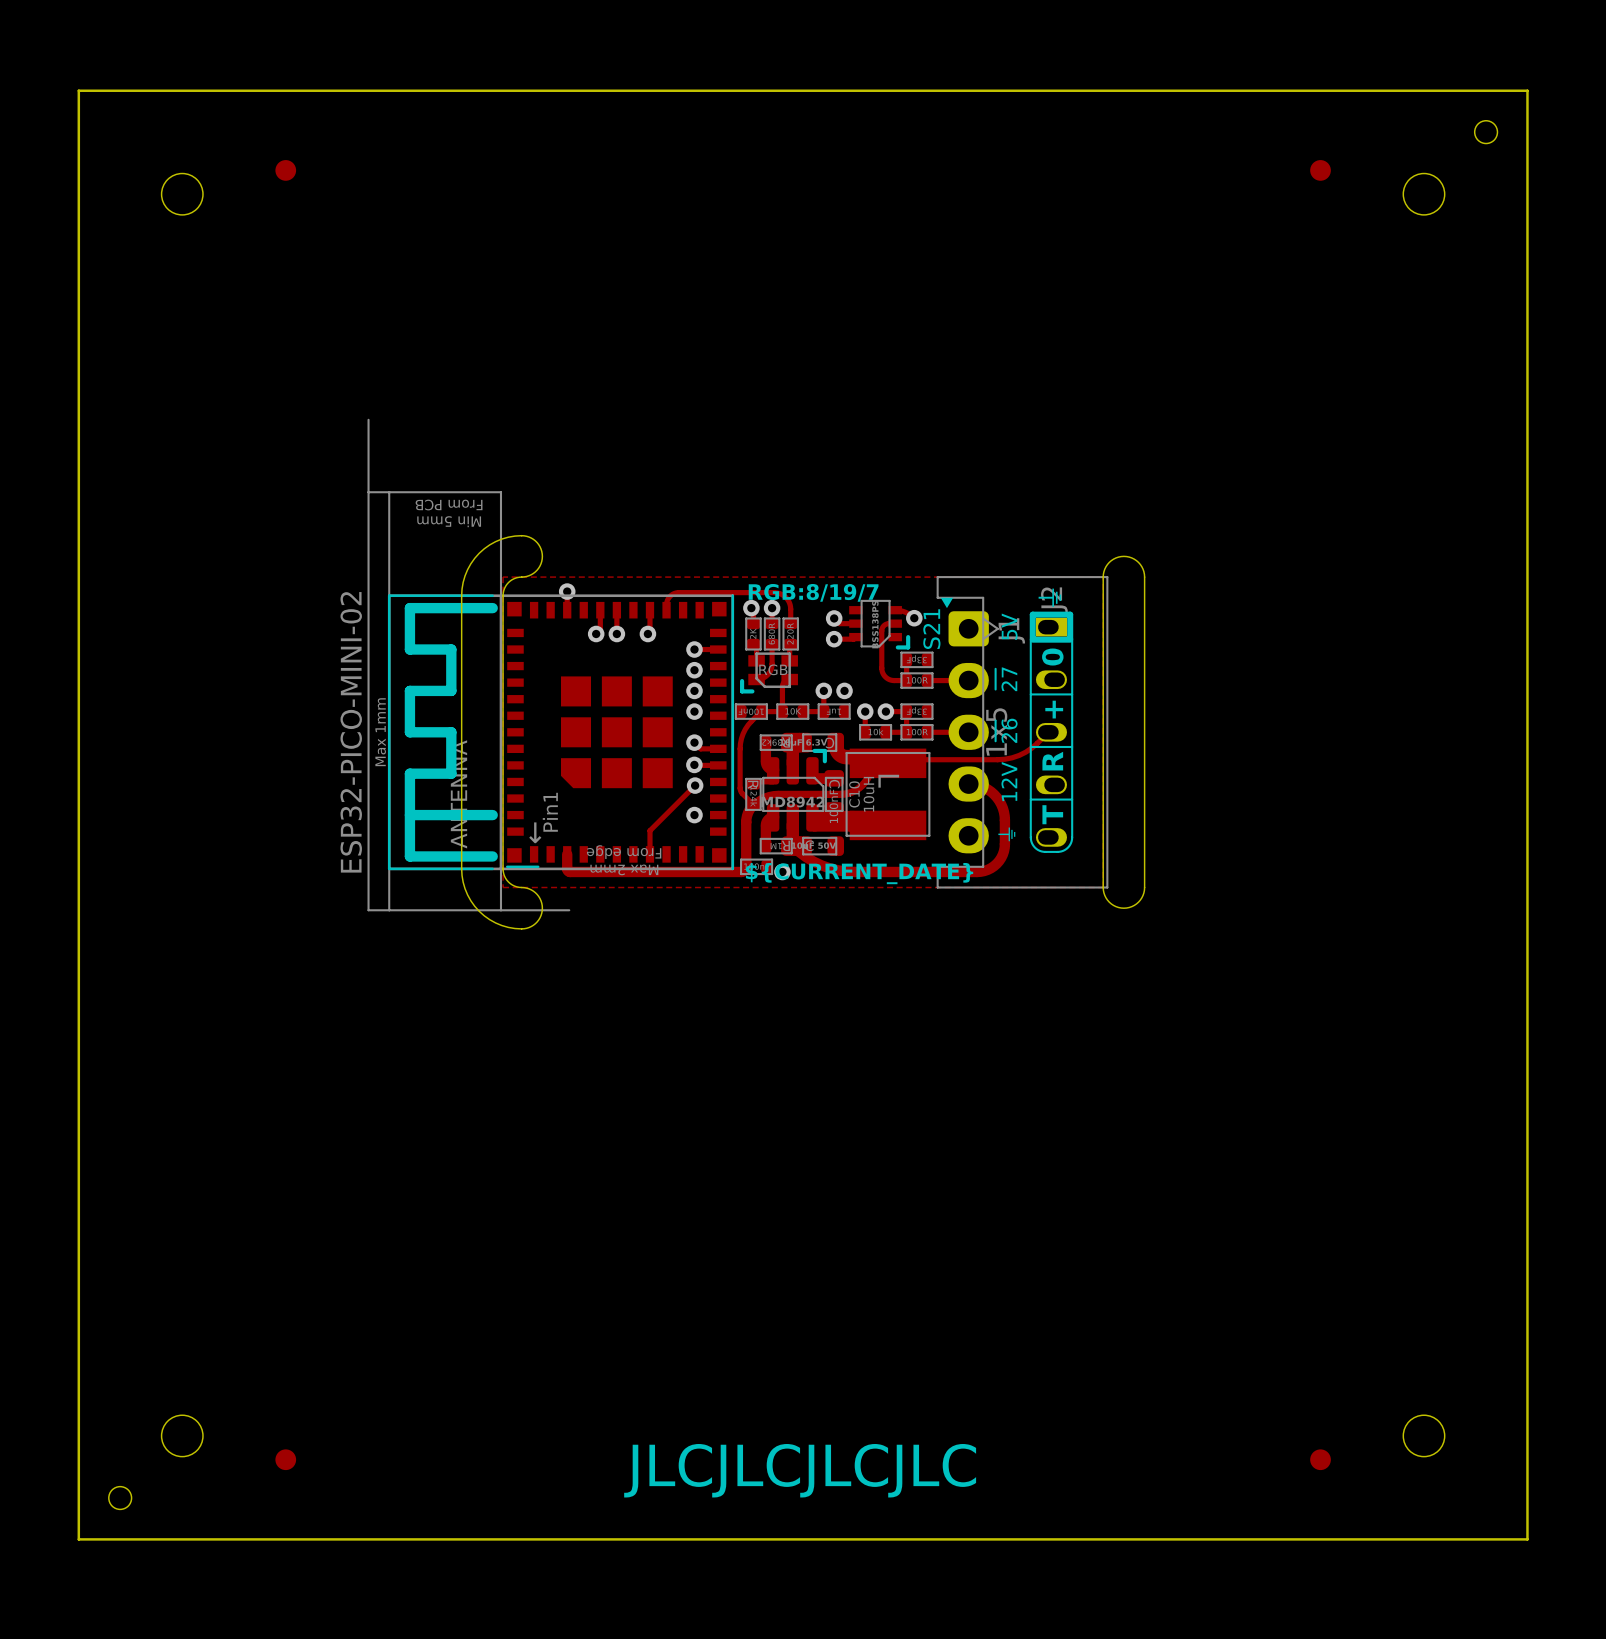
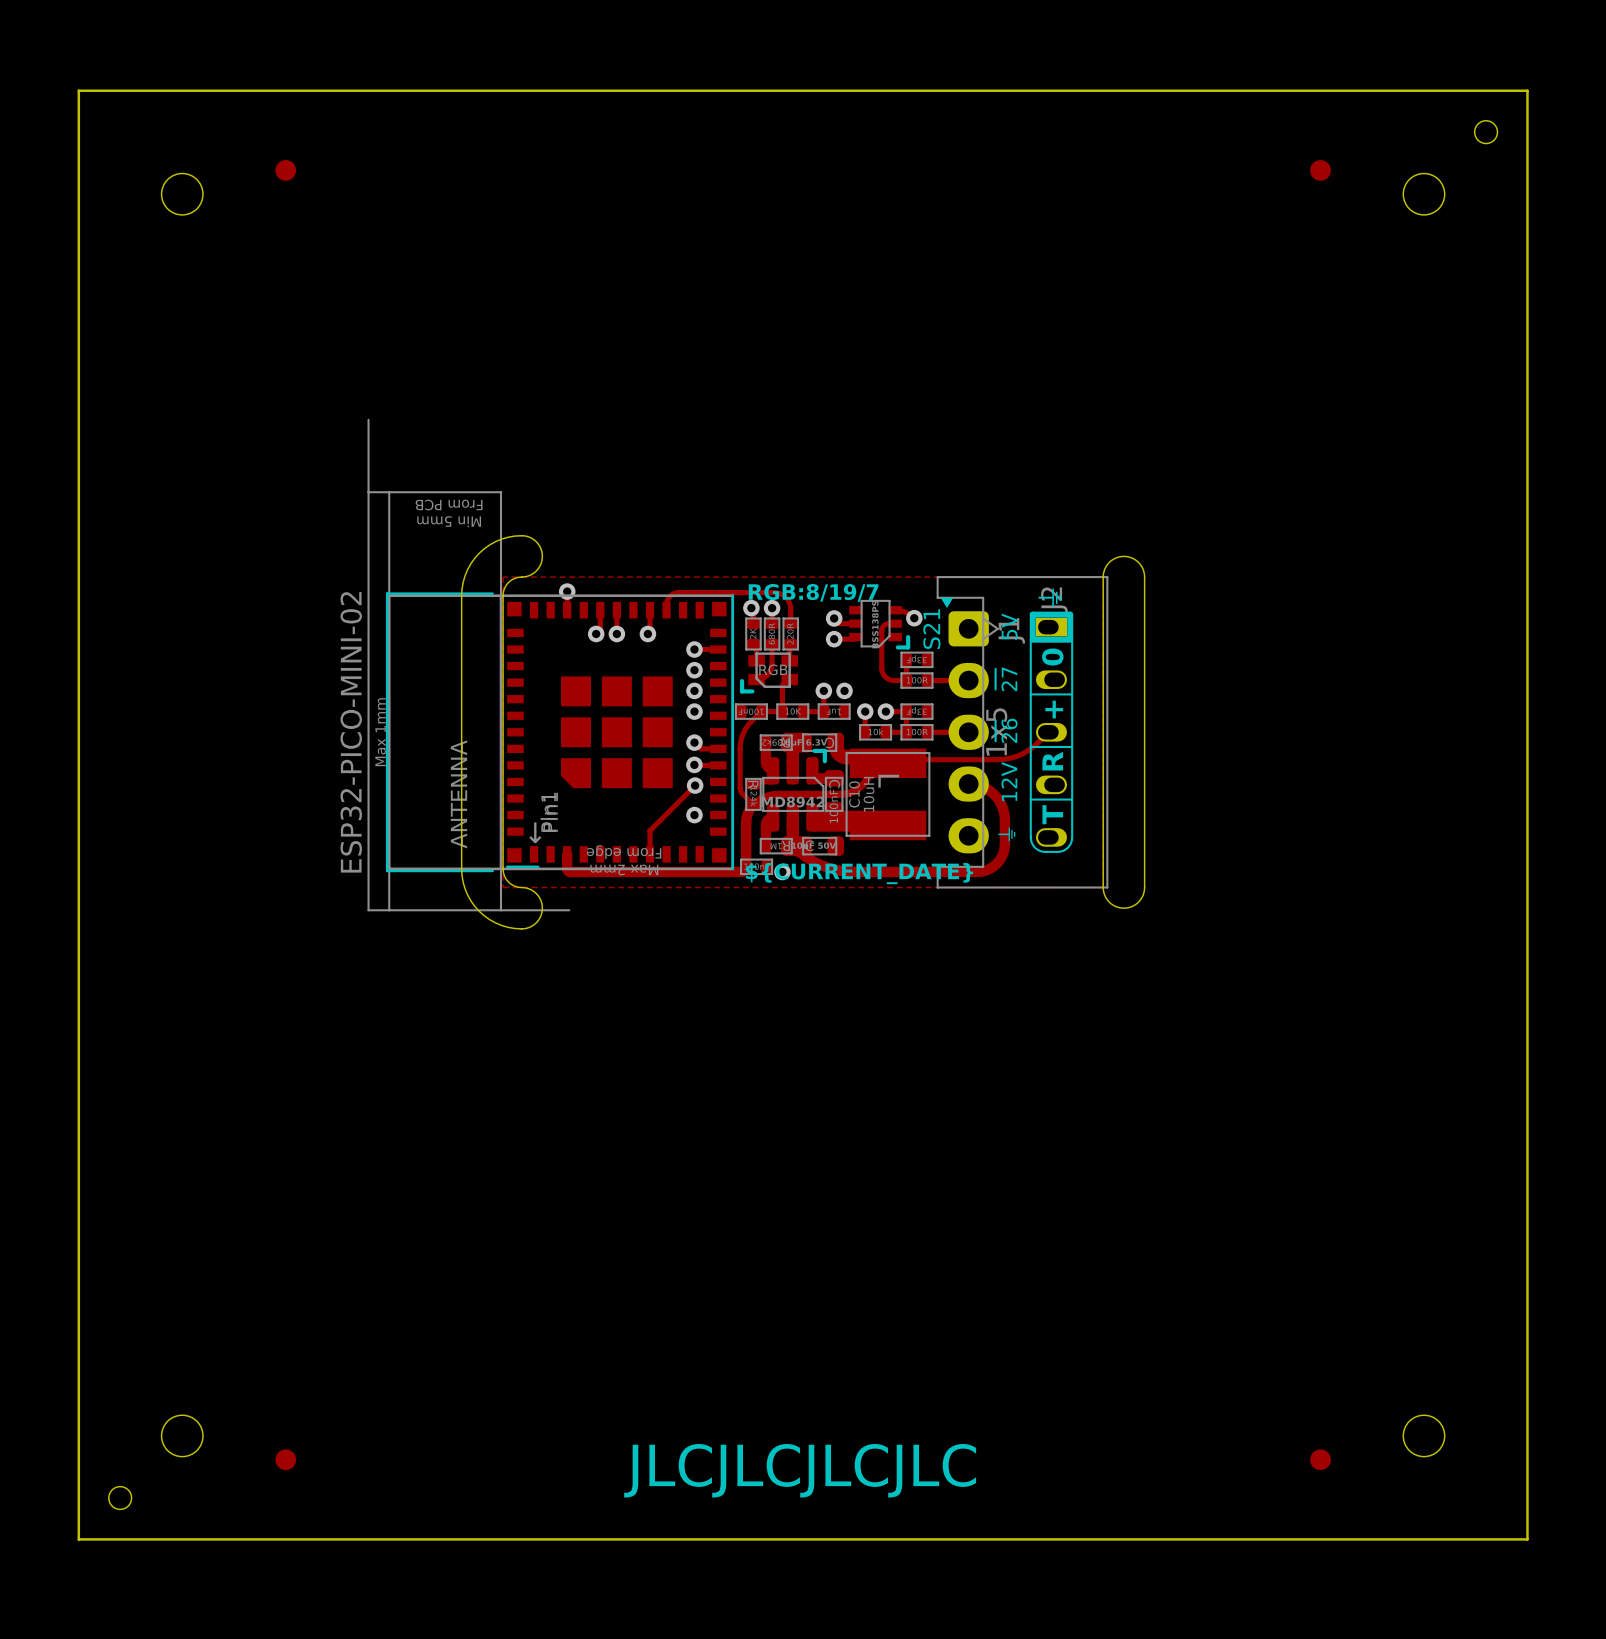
part footprint: [367, 418, 735, 912] -> [367, 418, 735, 912]

